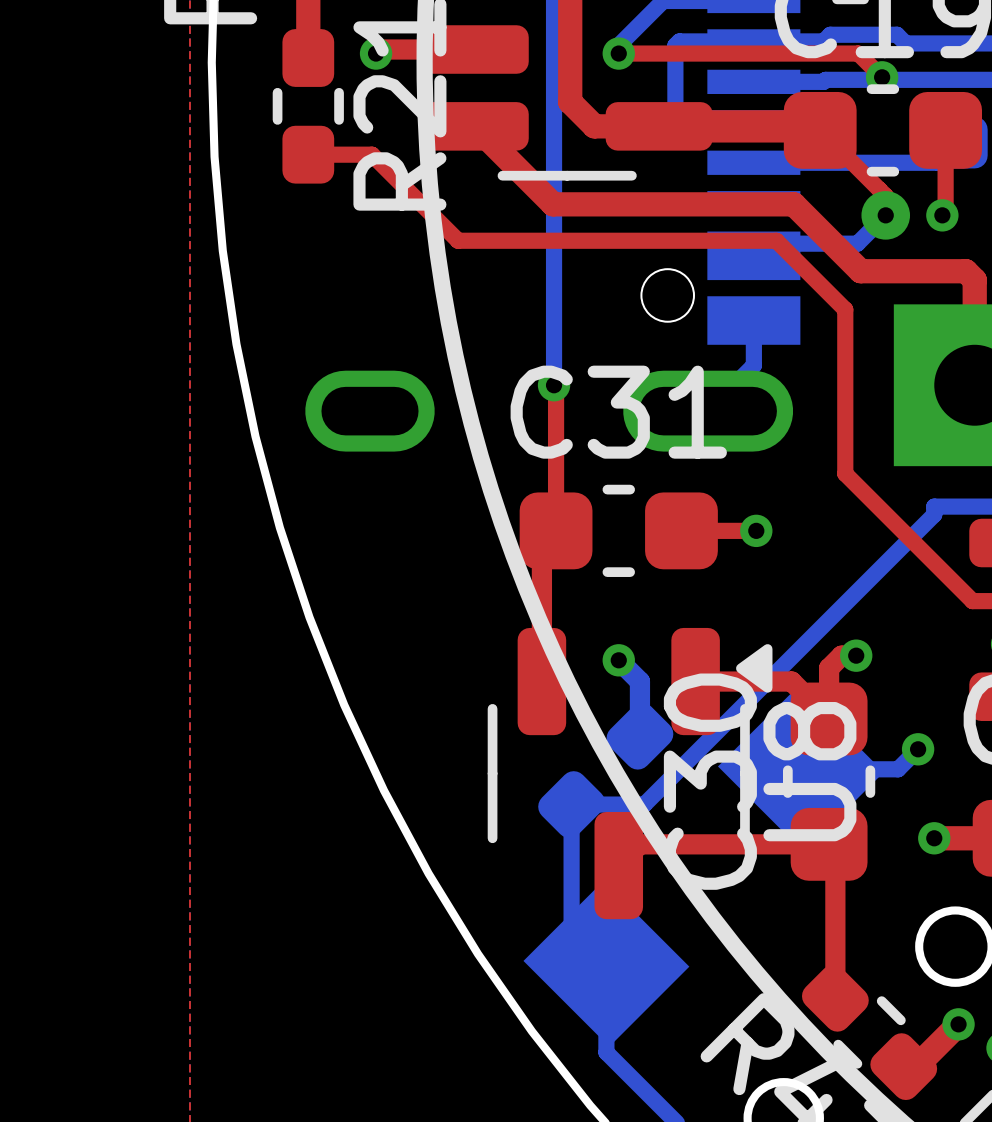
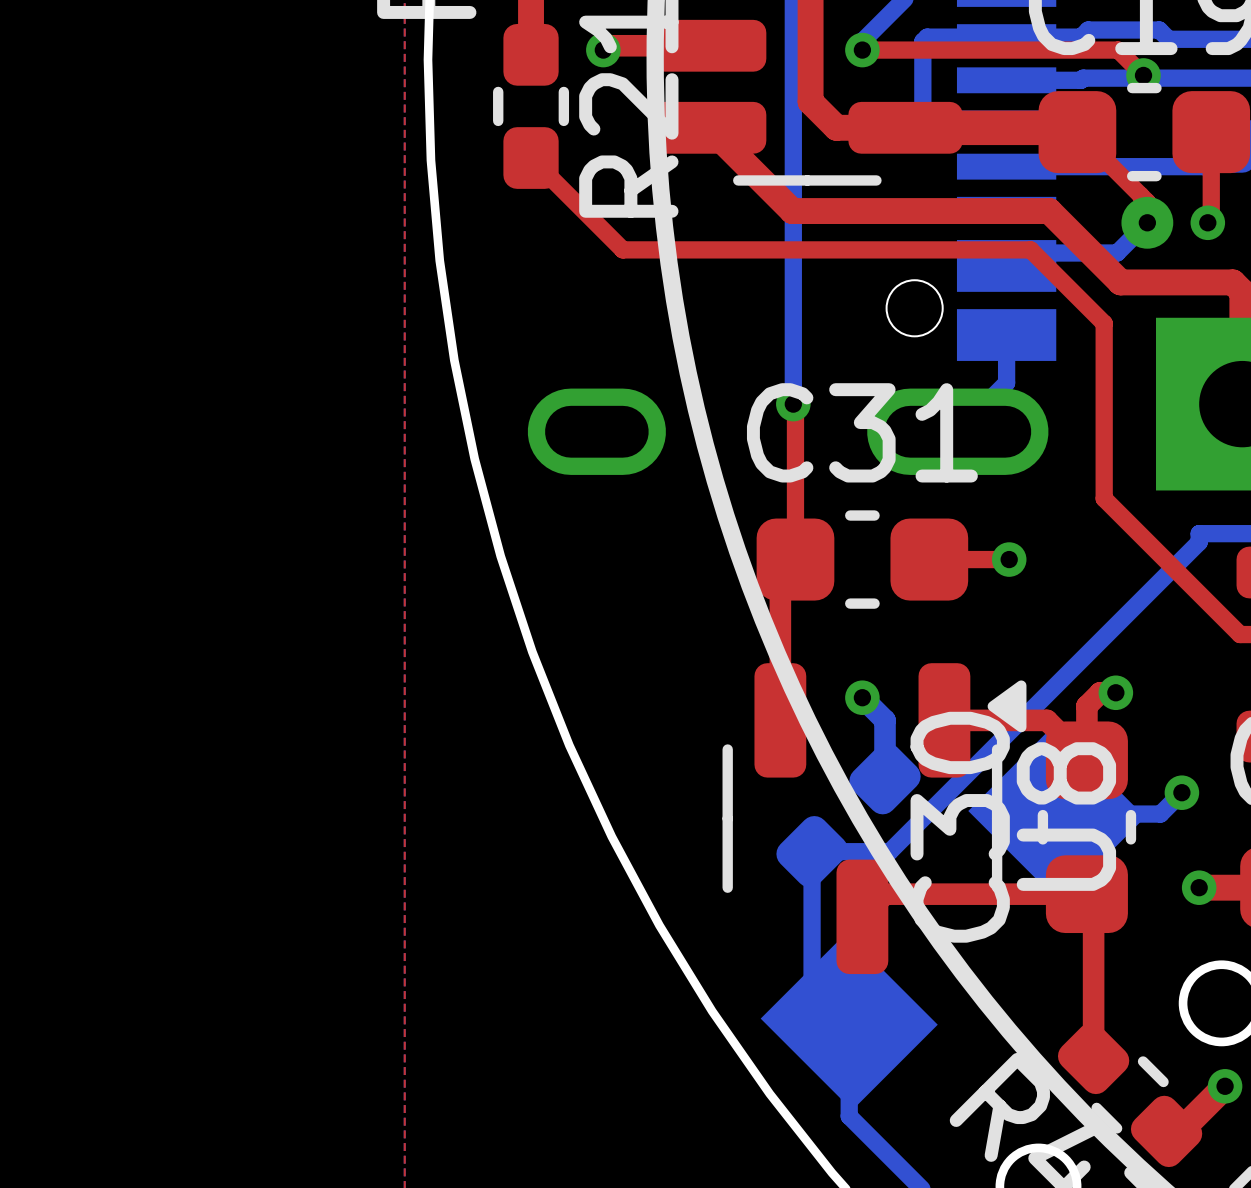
top track: (308, 154) (372, 154) (458, 240) -> (531, 158) (622, 249) (690, 249)

